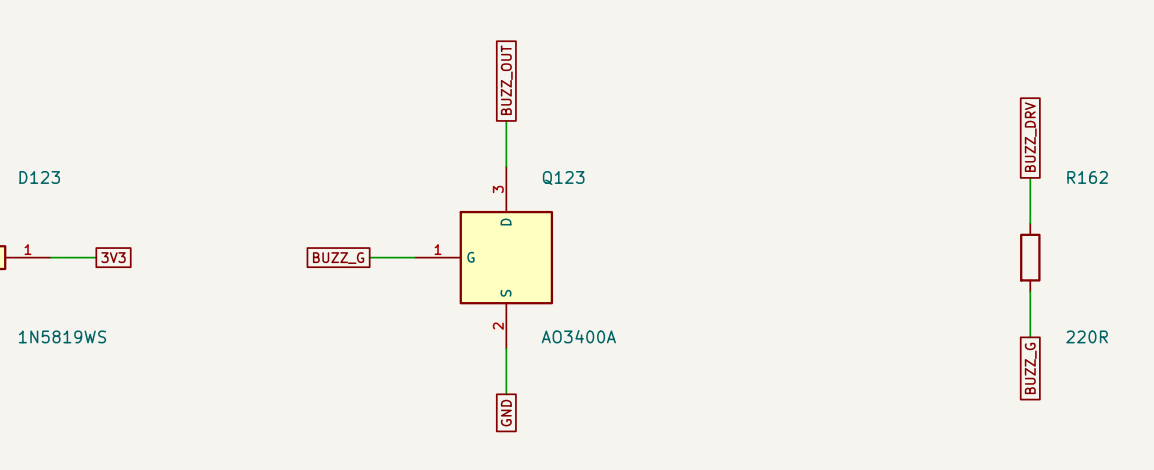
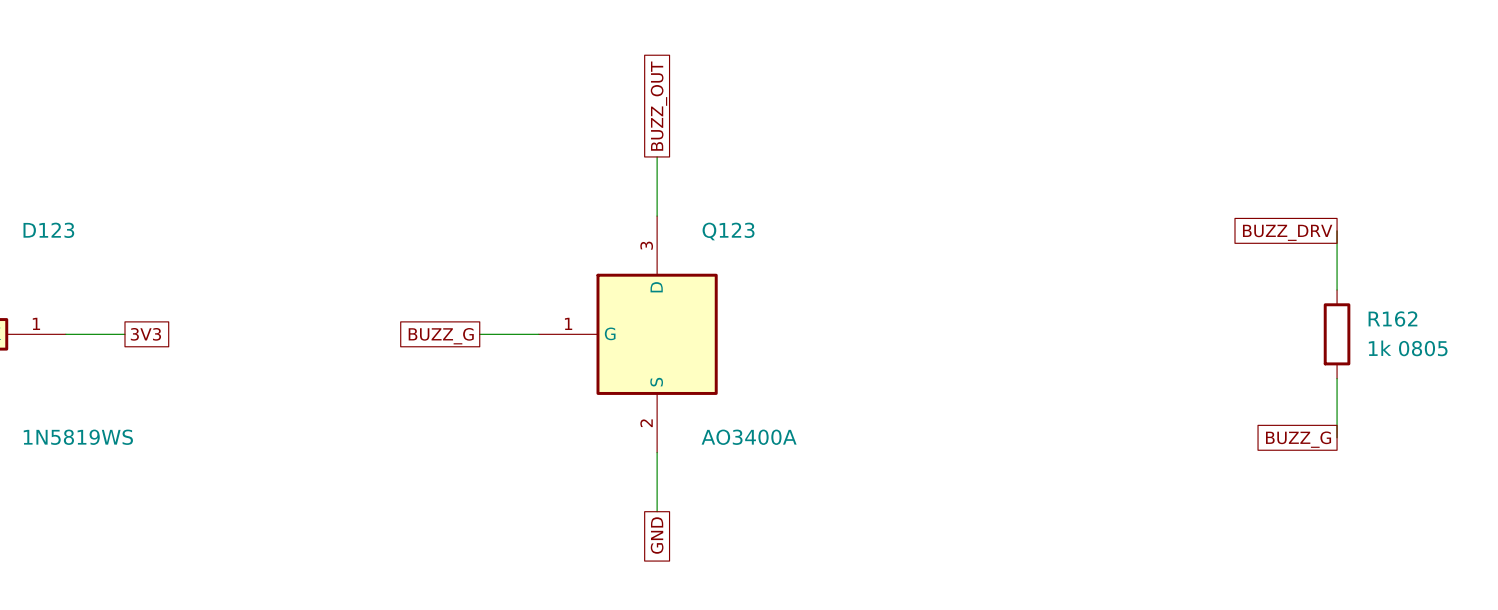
global label rotation: 0° (1030, 137) -> 90° counterclockwise (1287, 232)
R162 name position: R162 (1087, 177) -> R162 (1392, 319)
R162 value: 220R (1087, 336) -> 1k 0805 (1408, 348)
global label rotation: 0° (1030, 368) -> 90° clockwise (1298, 439)

